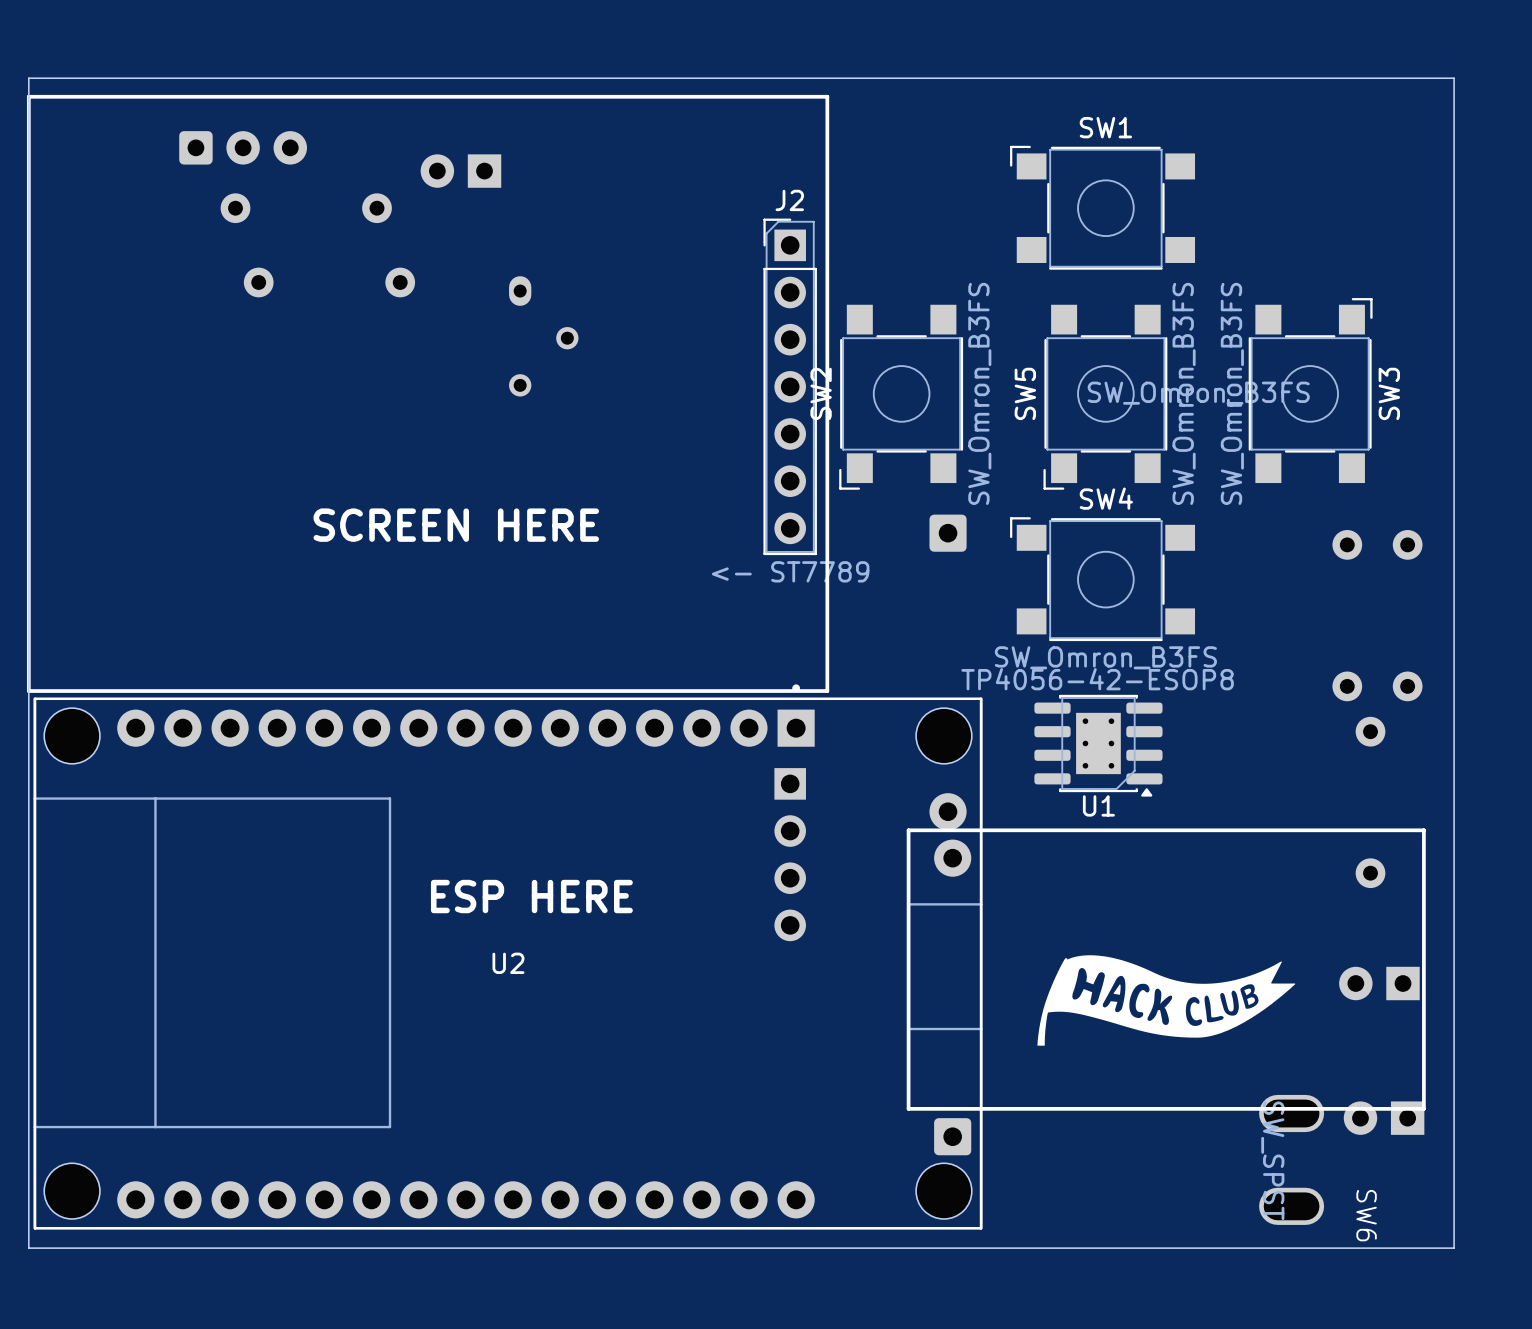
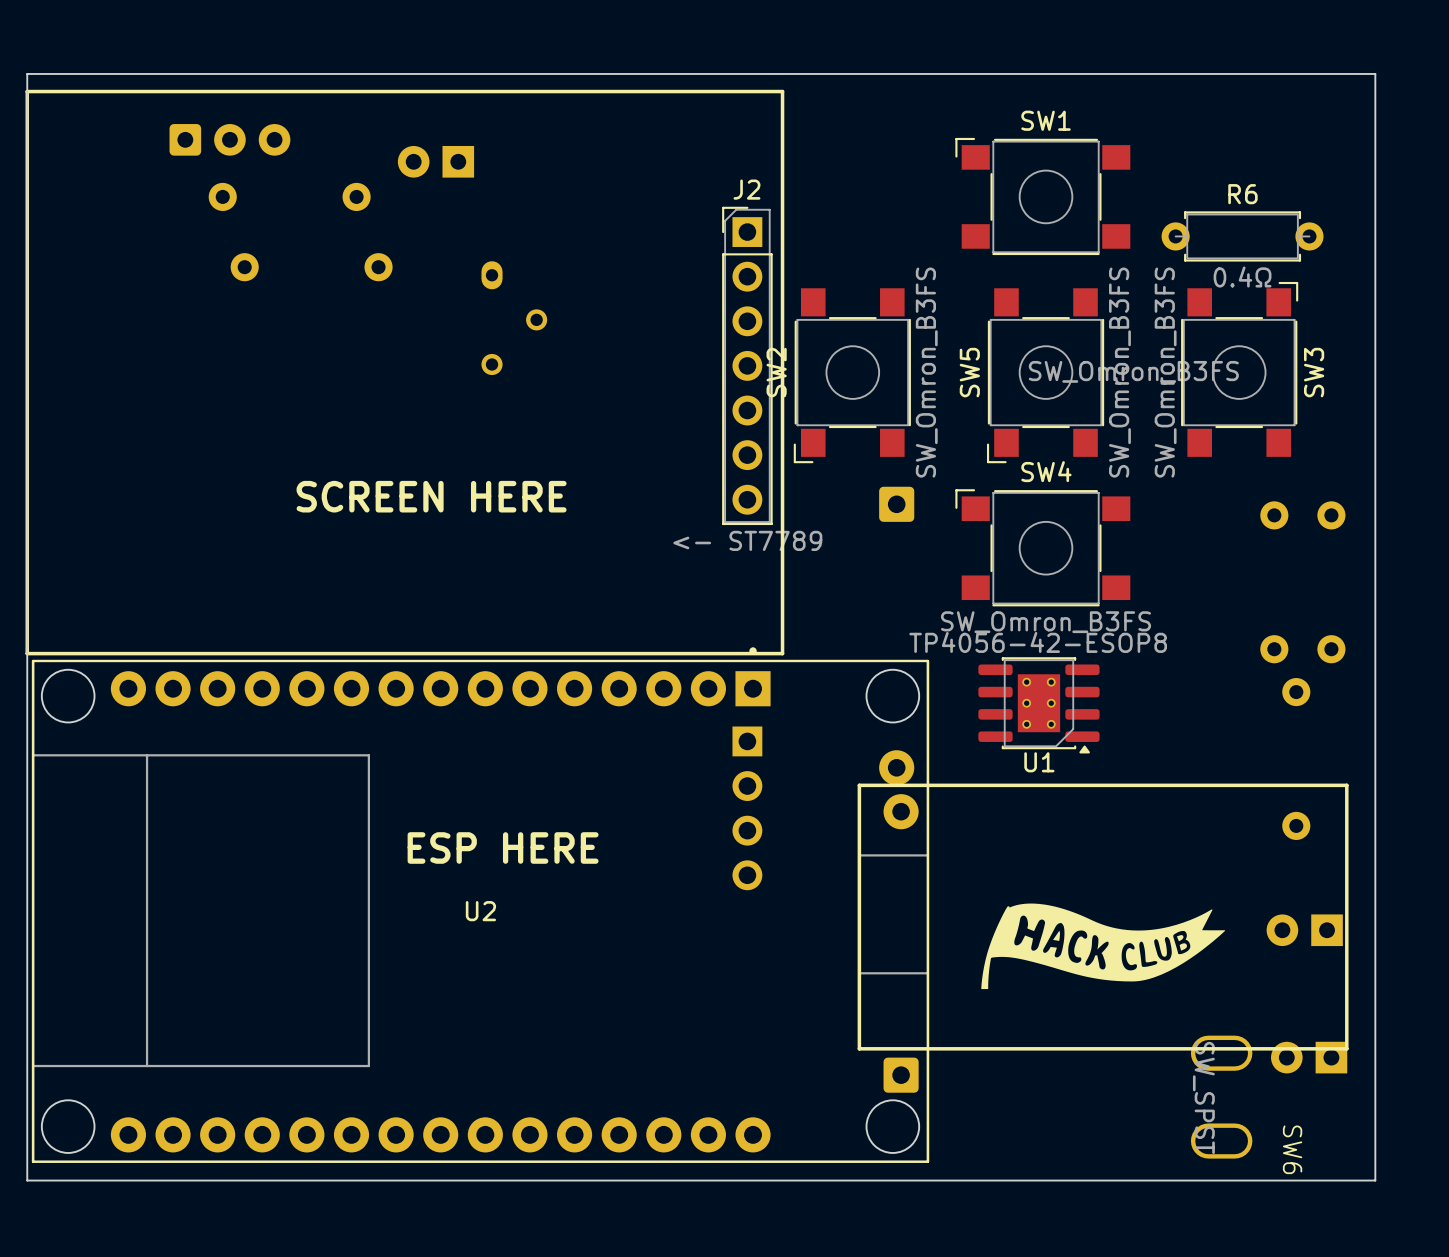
R6: none -> 0.4Ω (1242, 236)

